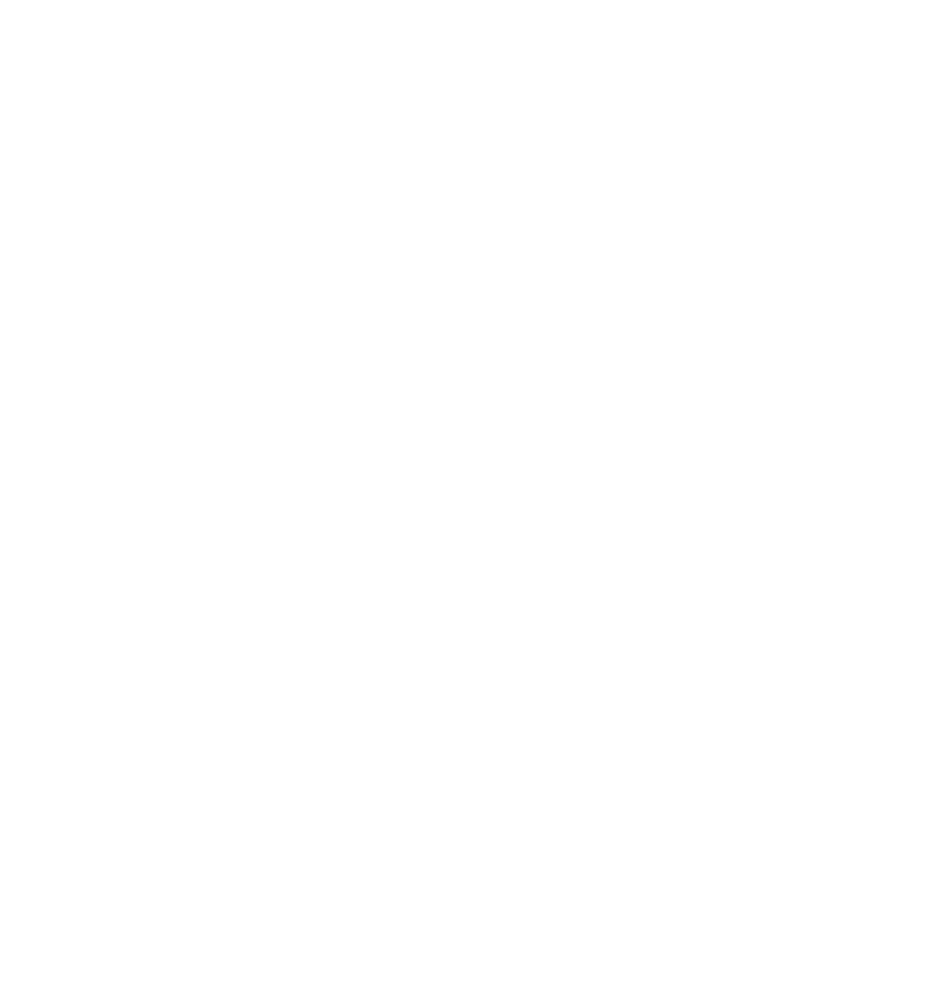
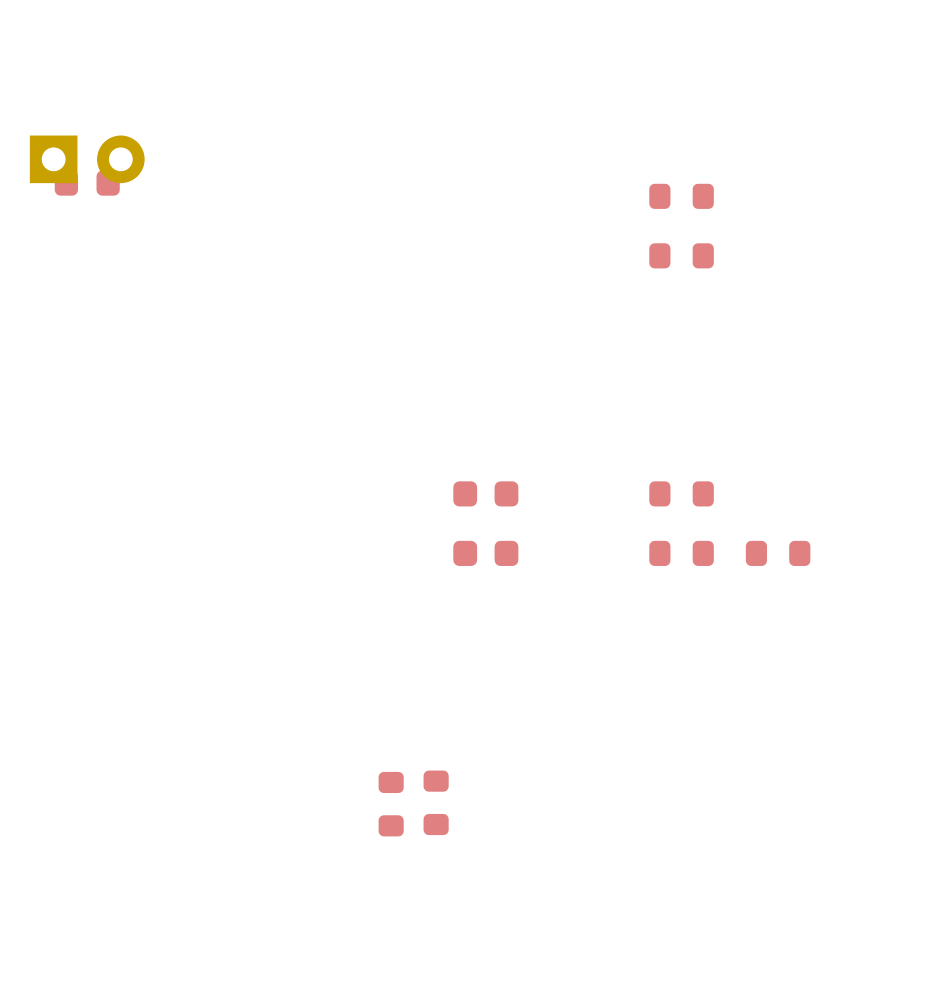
part: none -> (87, 165)
part: none -> (681, 196)
part: none -> (681, 255)
part: none -> (485, 493)
part: none -> (681, 493)
part: none -> (485, 553)
part: none -> (681, 553)
part: none -> (778, 553)
part: none -> (436, 802)
part: none -> (391, 804)

